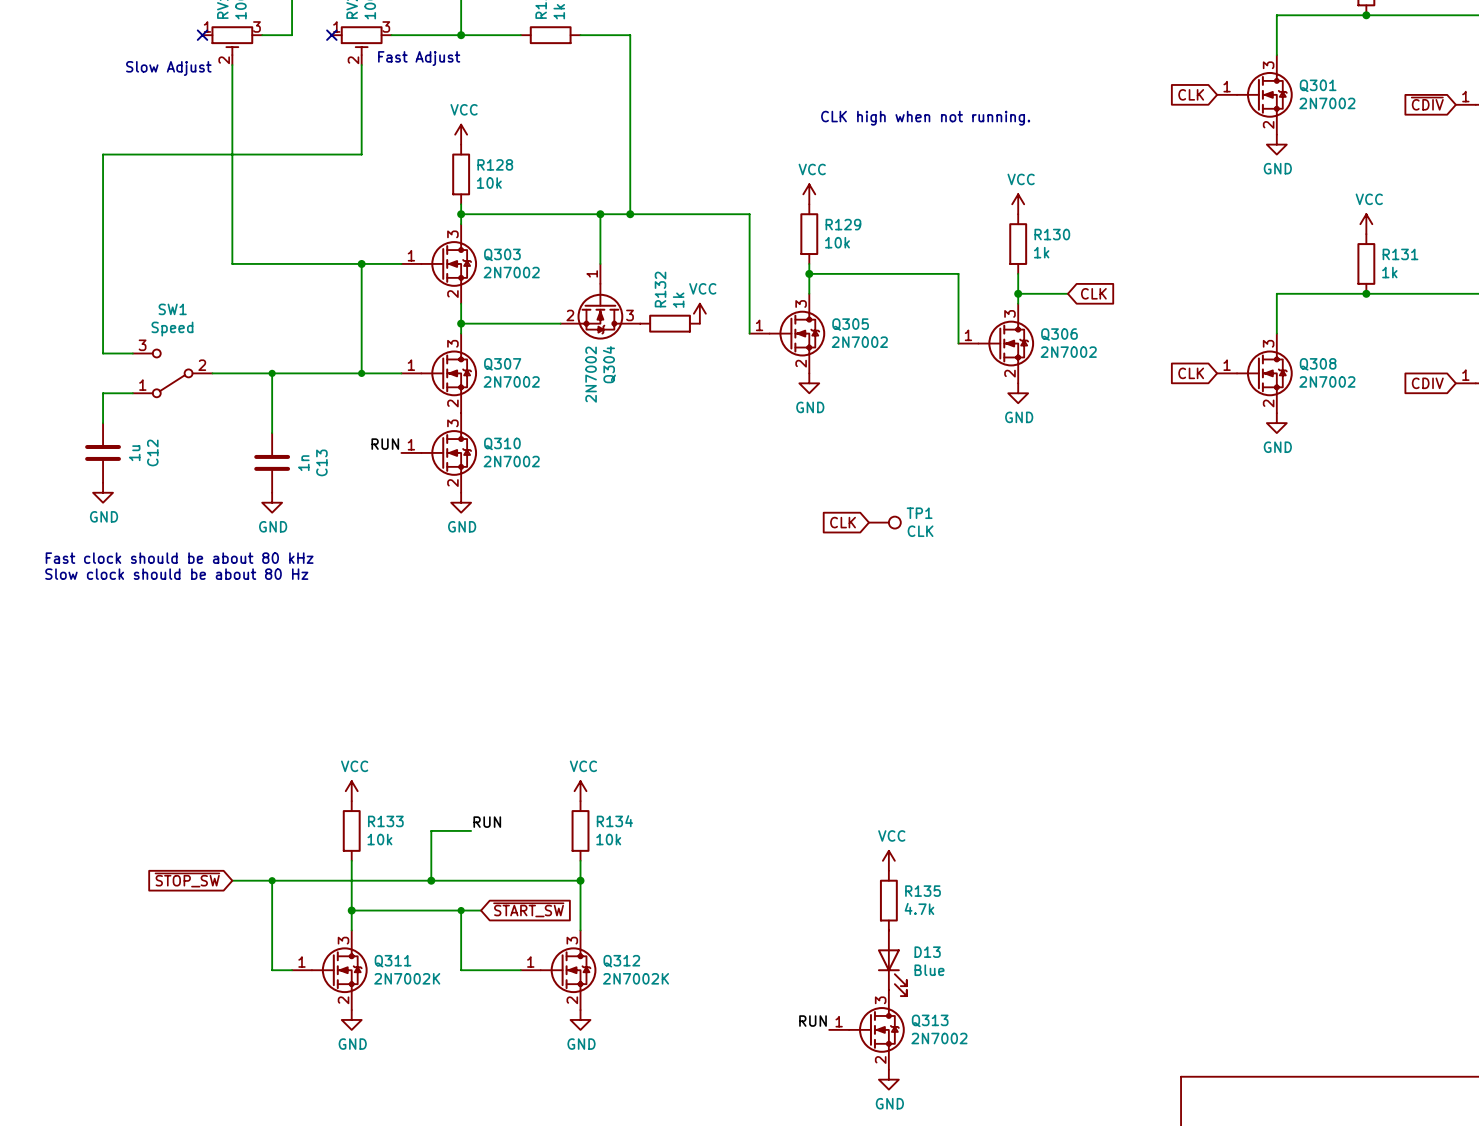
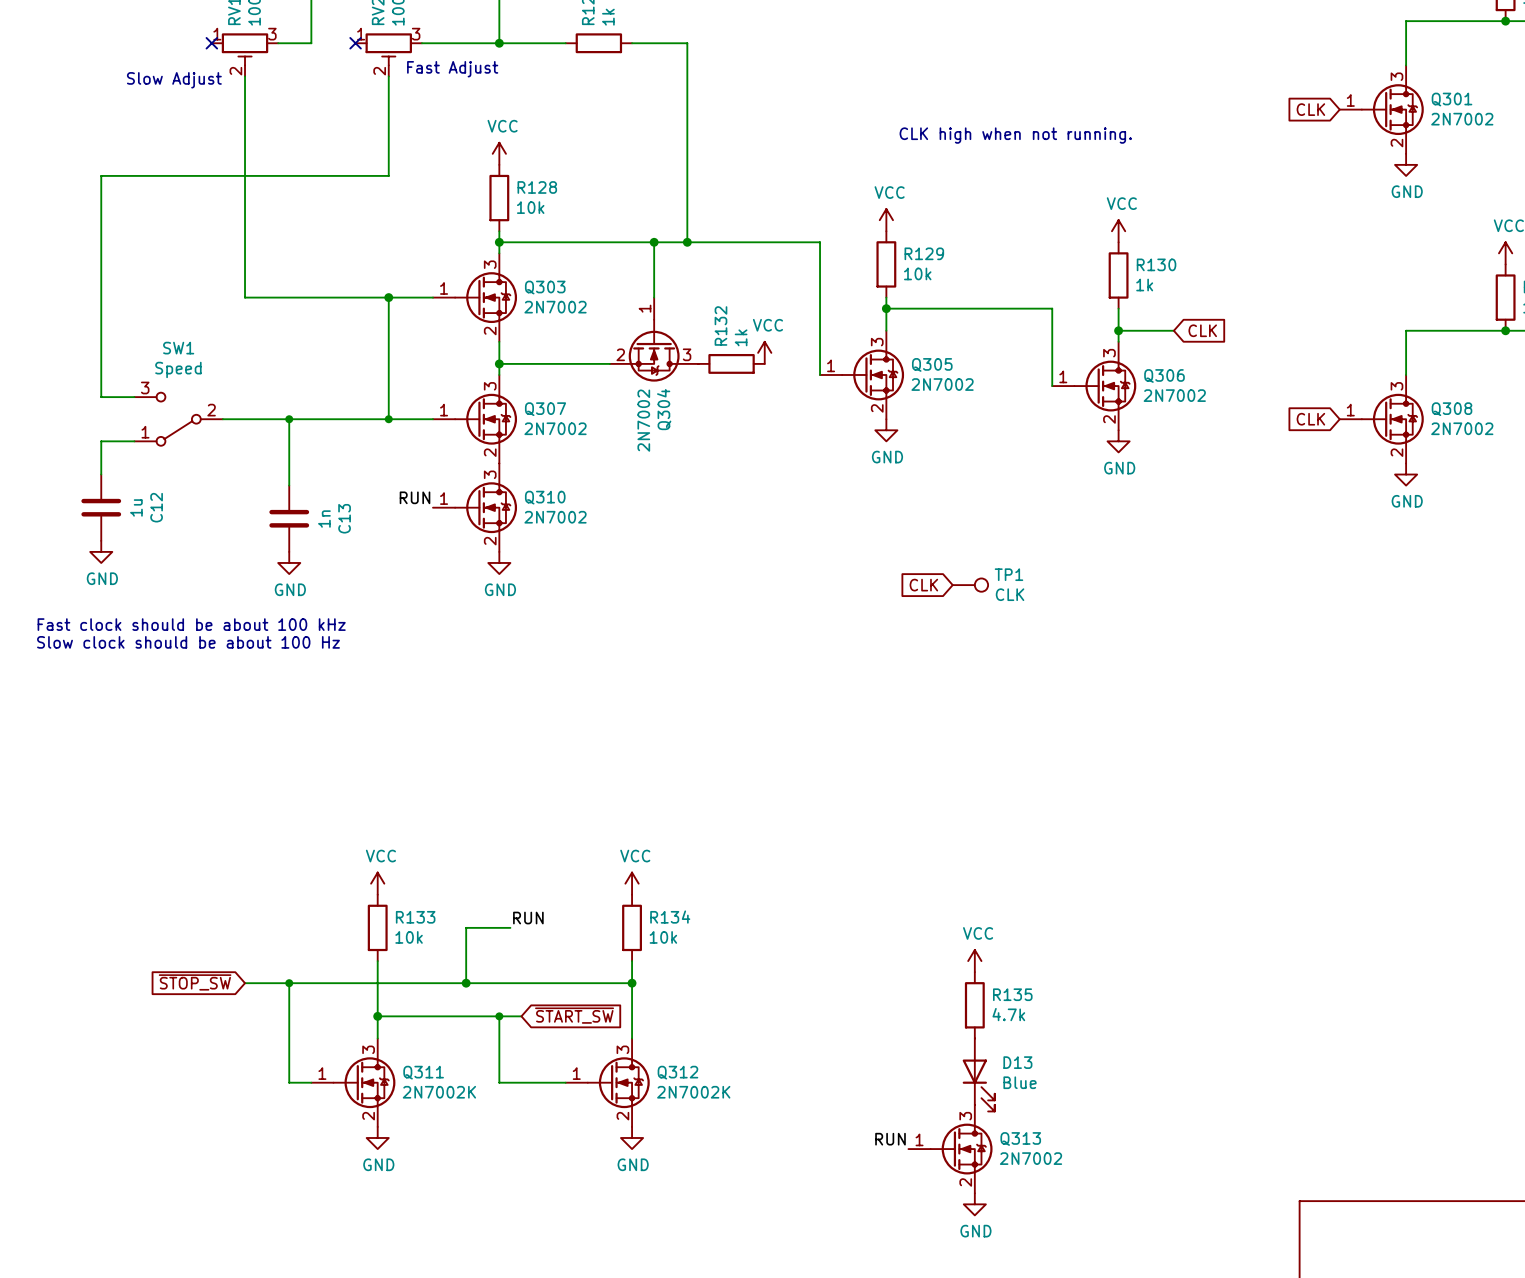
text: Fast clock should be about 80 kHz (179, 558) -> Fast clock should be about 100 kHz (191, 624)
text: Slow clock should be about 80 Hz (176, 574) -> Slow clock should be about 100 Hz (188, 642)

